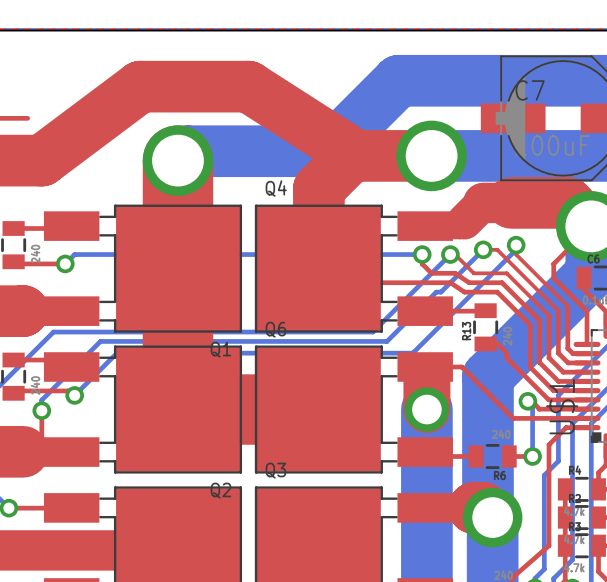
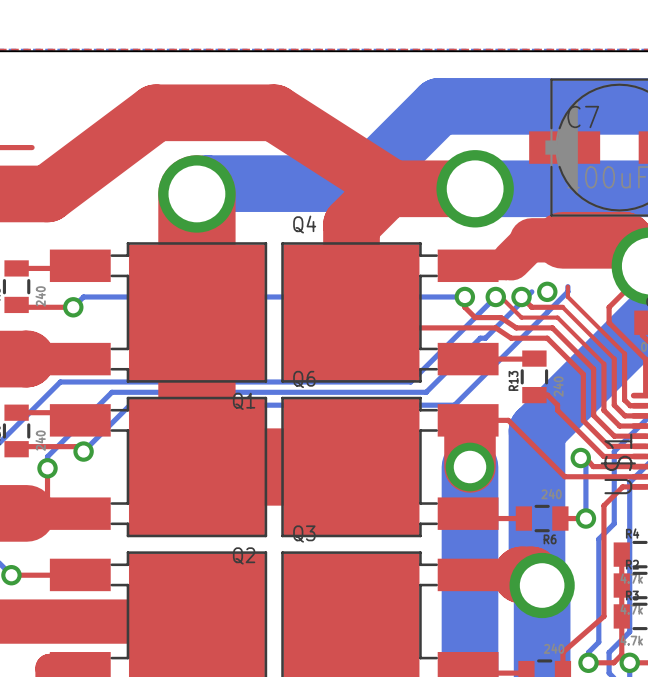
via: (516, 245) -> none
top track: (483, 249) (497, 249) (511, 263) -> (521, 296) (531, 307) (562, 307)
via: (483, 249) -> none
via: none -> (547, 291)
via: none -> (521, 296)

